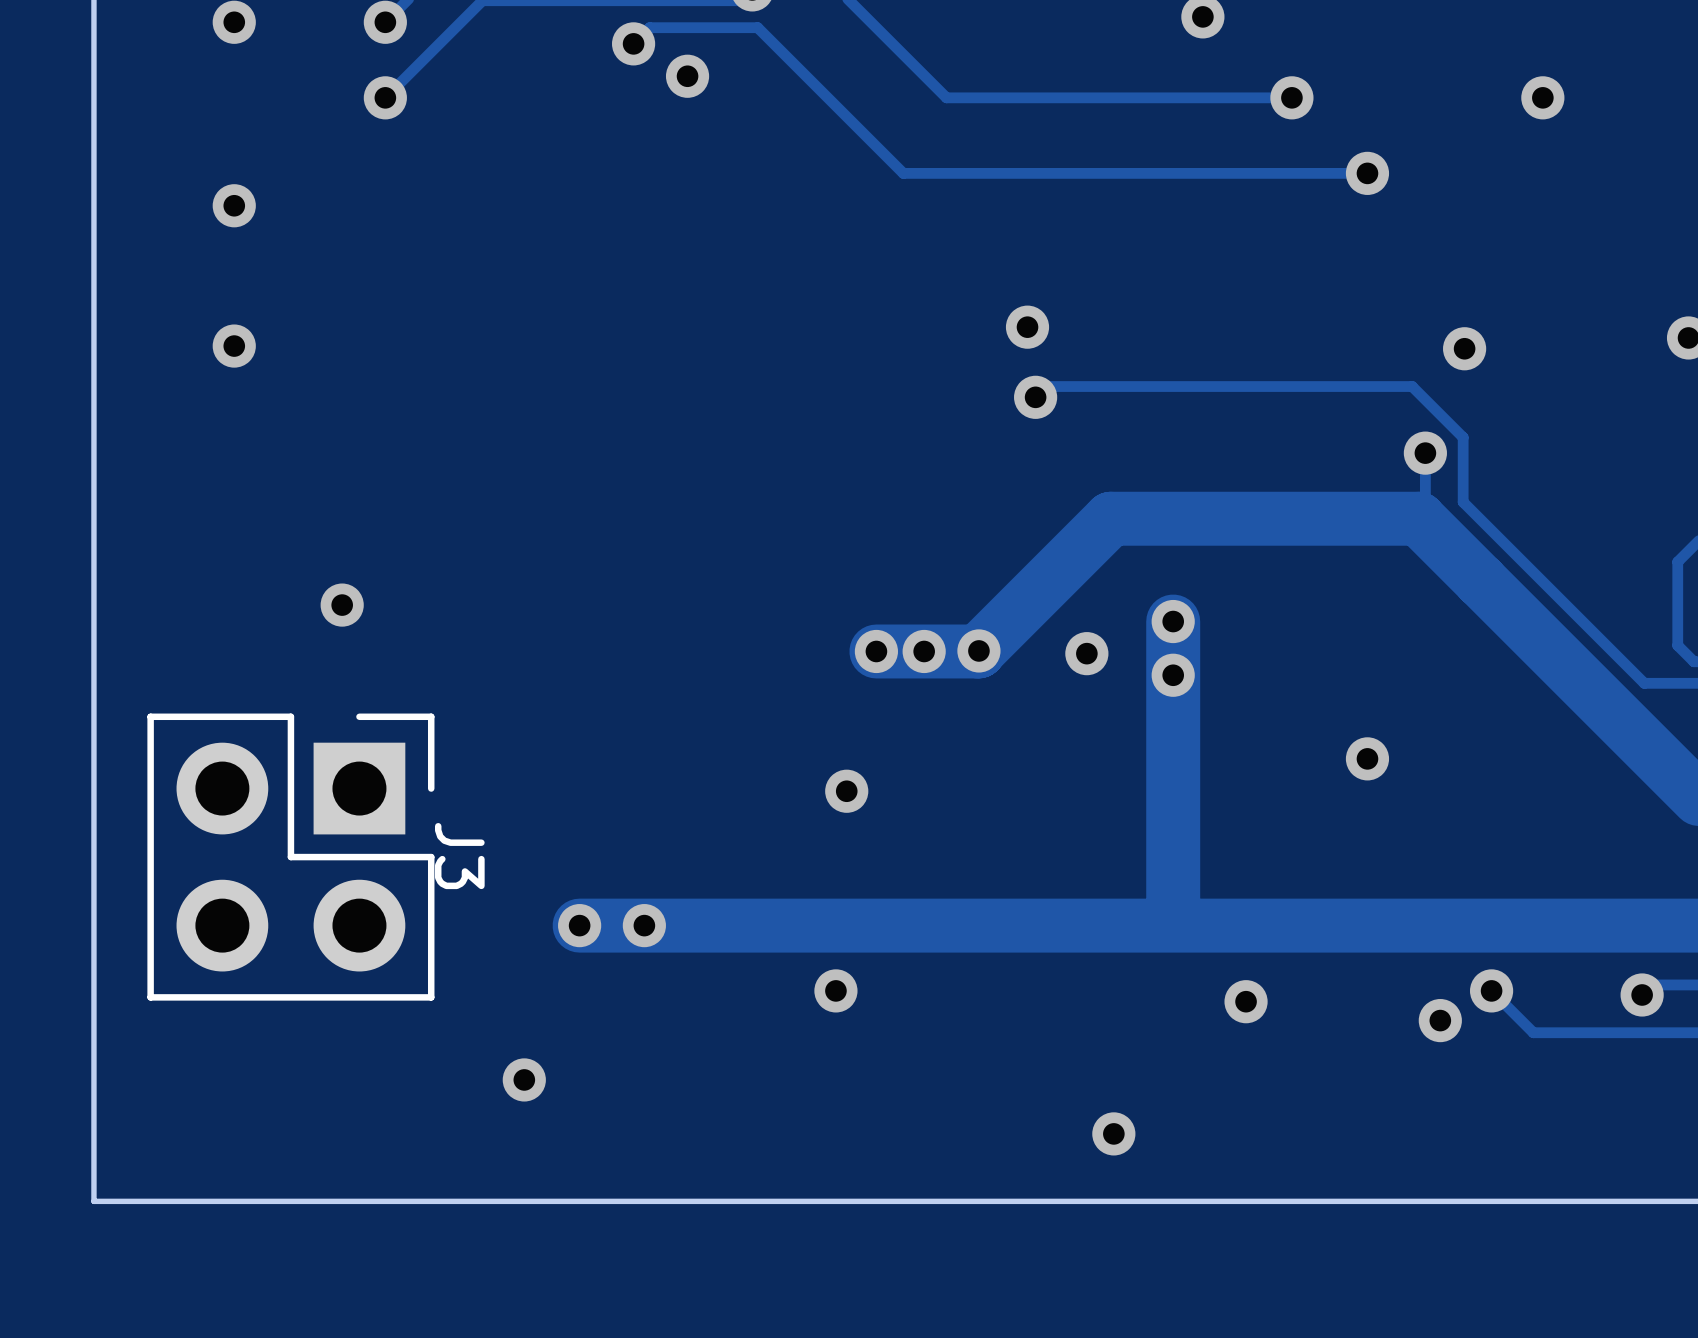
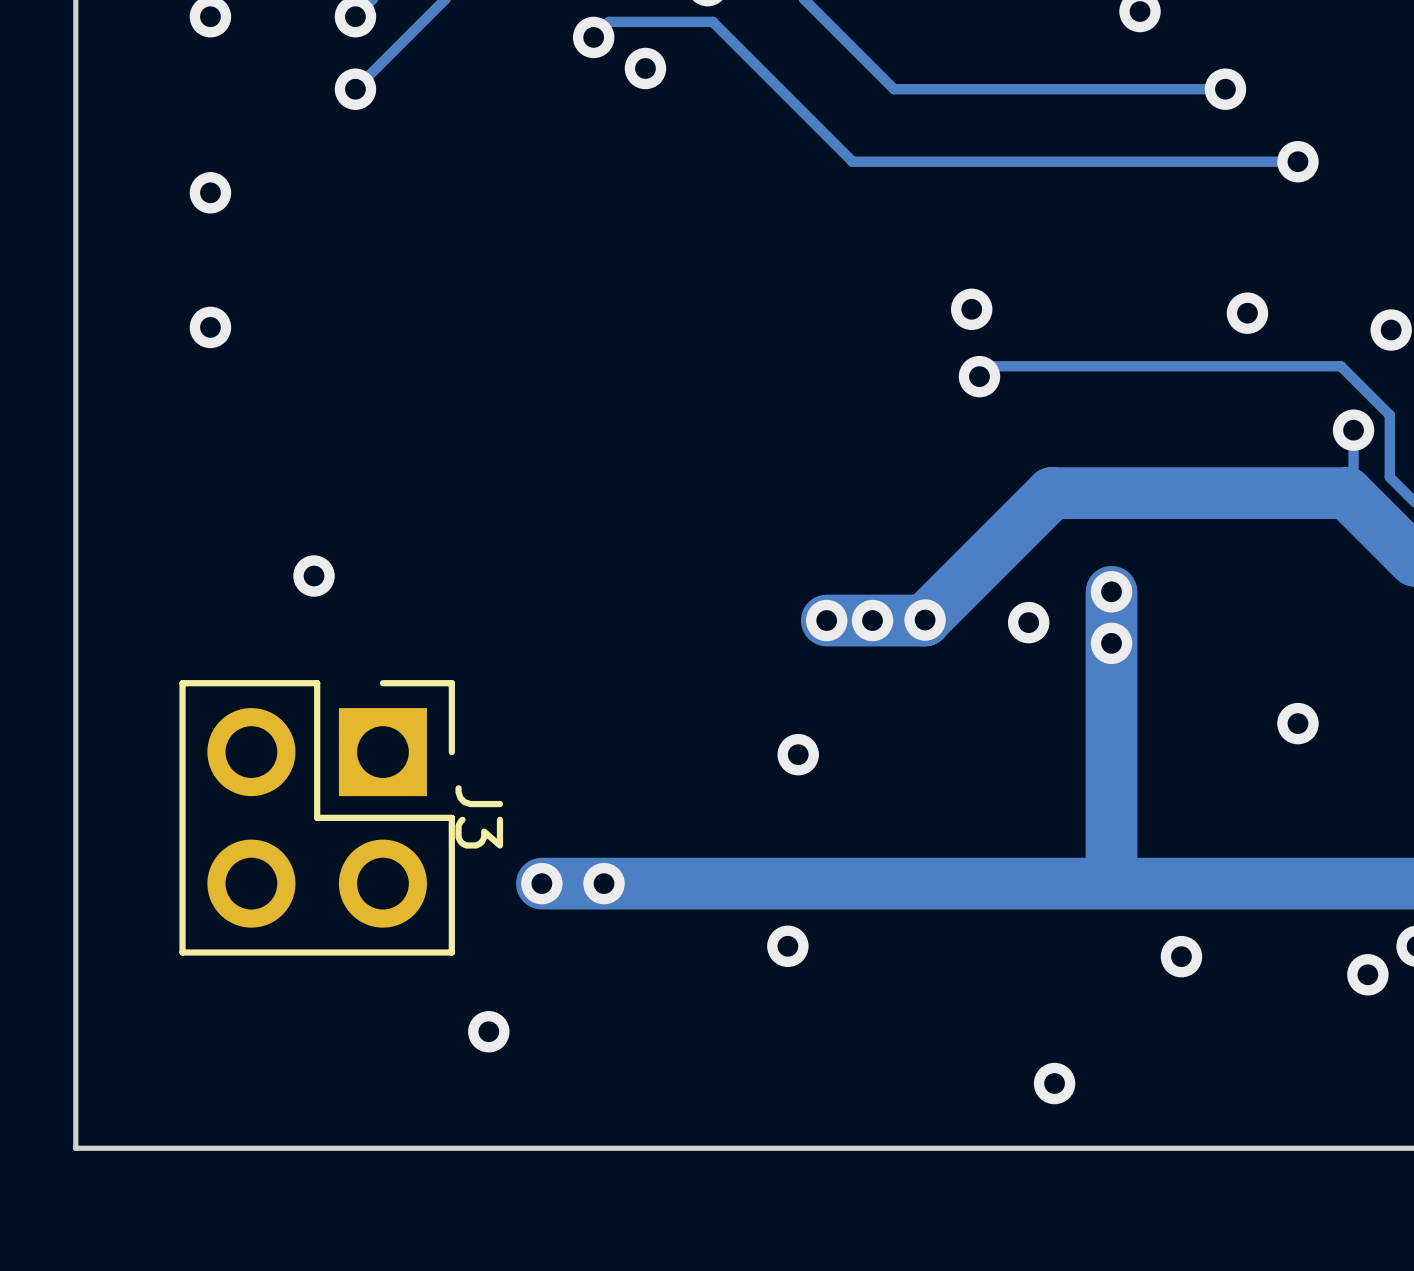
via: none -> (1247, 313)
J3 position: (290, 857) -> (317, 817)

